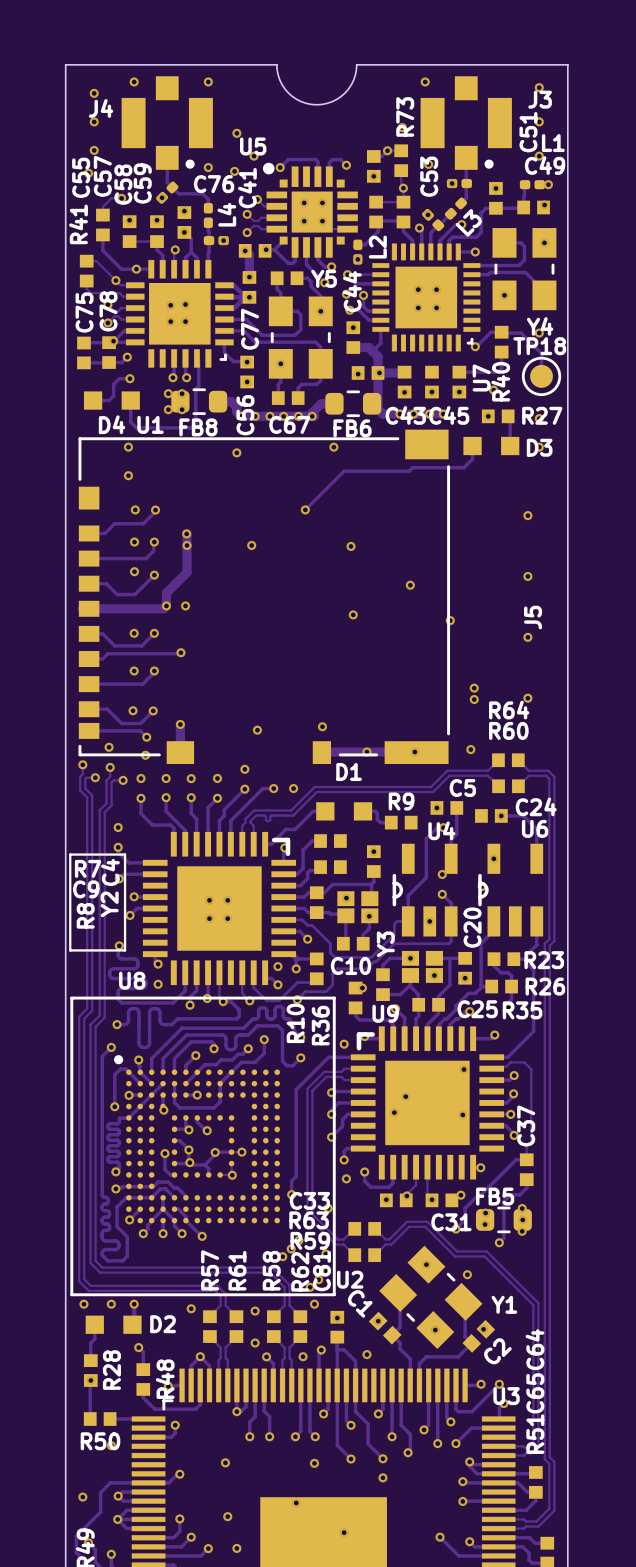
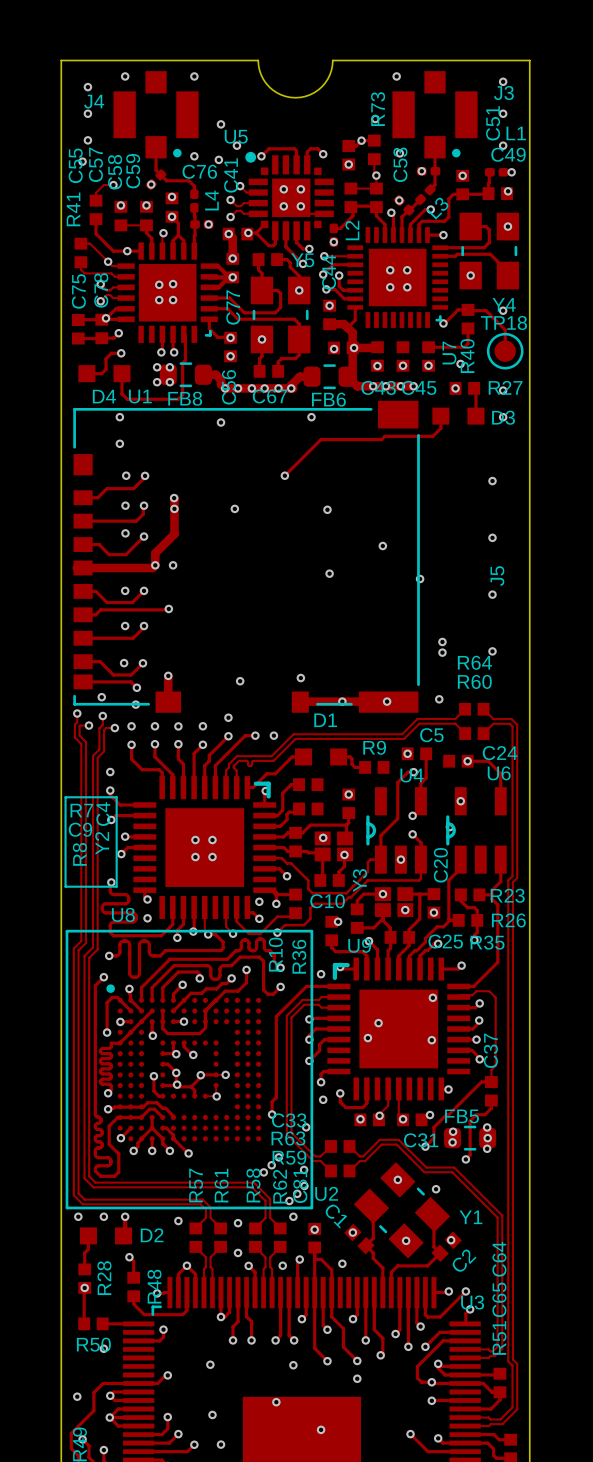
track: none -> (465, 1340) (443, 1340) (417, 1366) (417, 1378) (421, 1382) (431, 1382)

